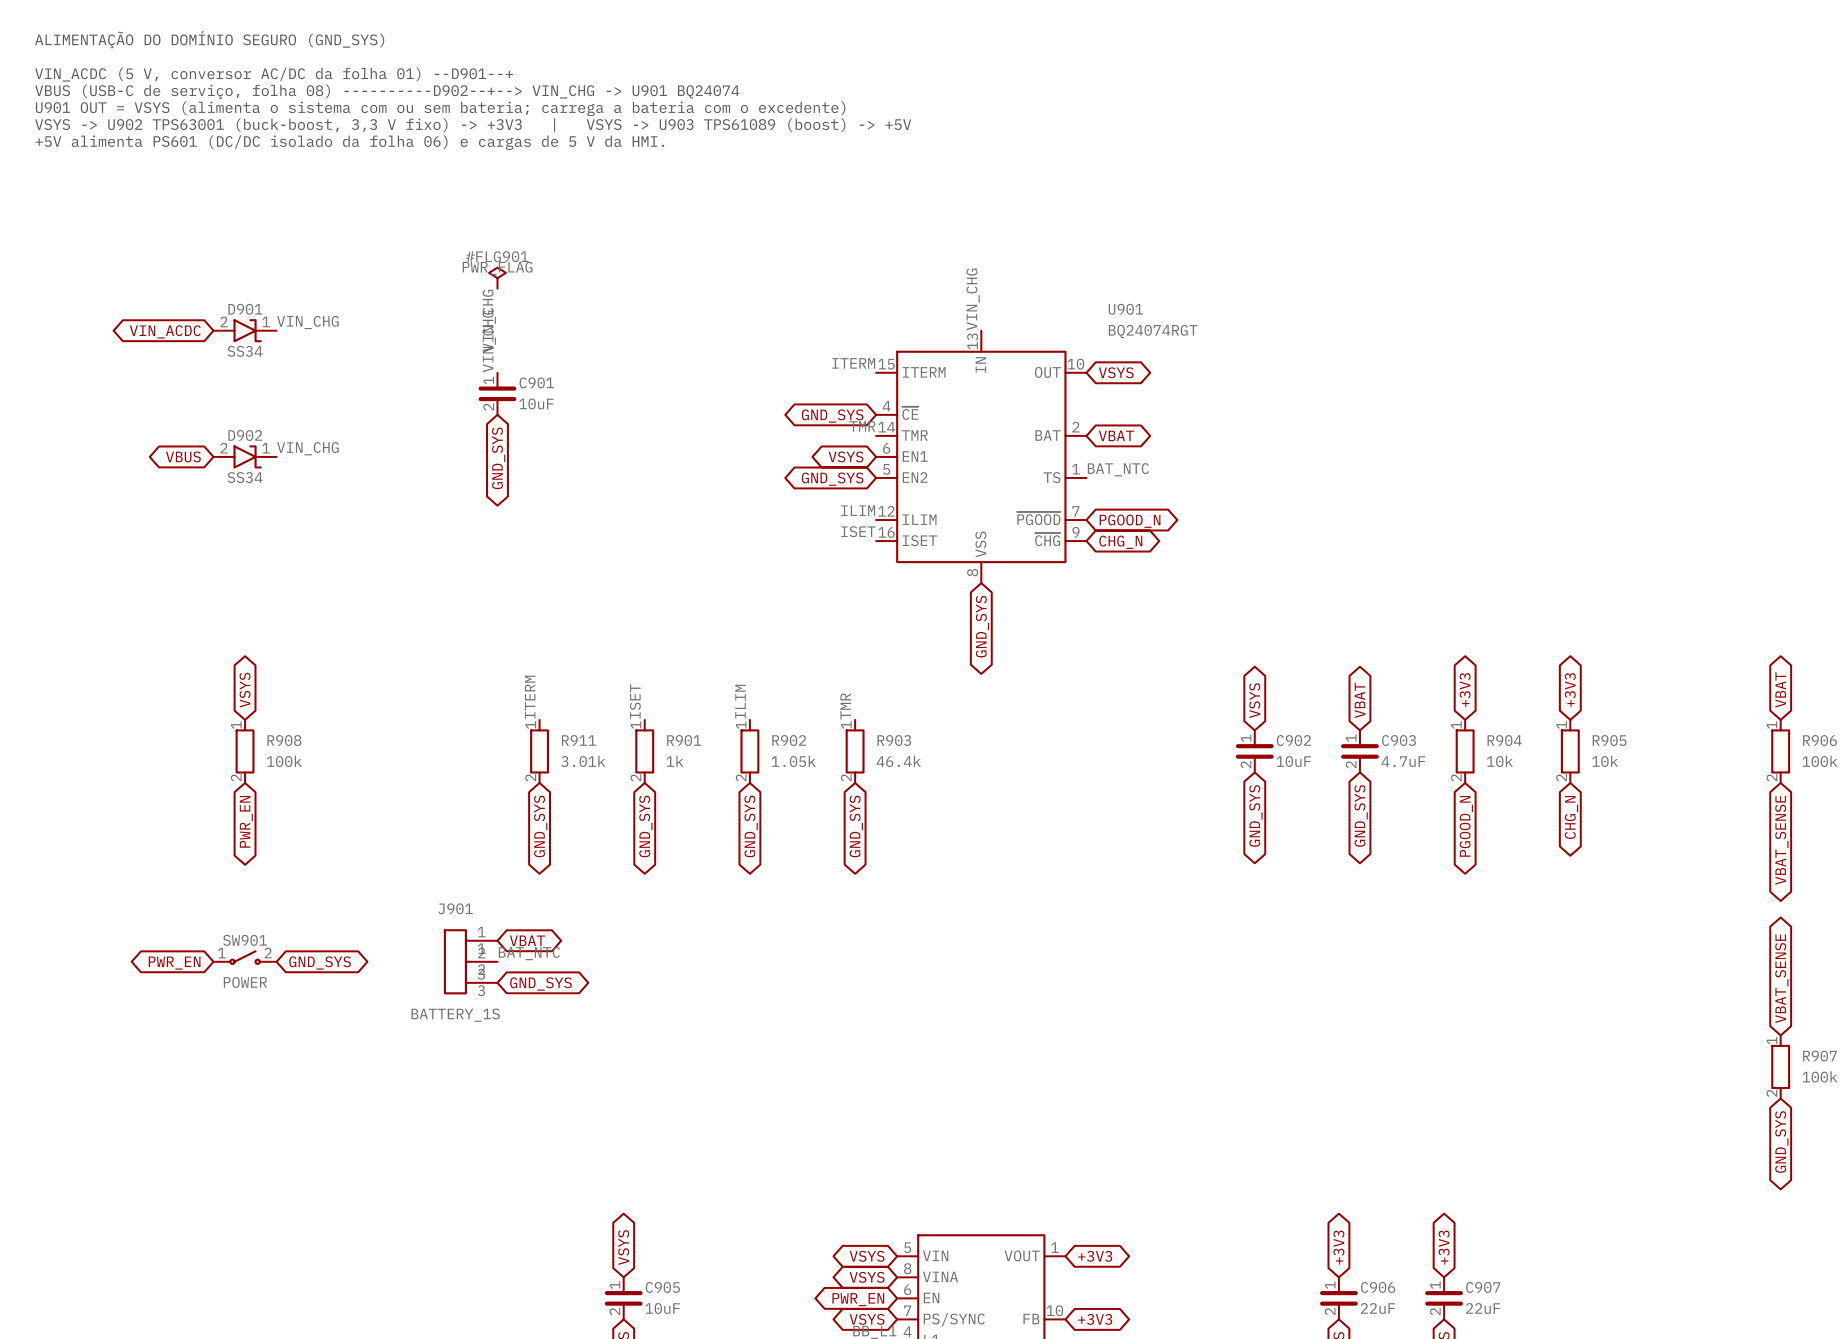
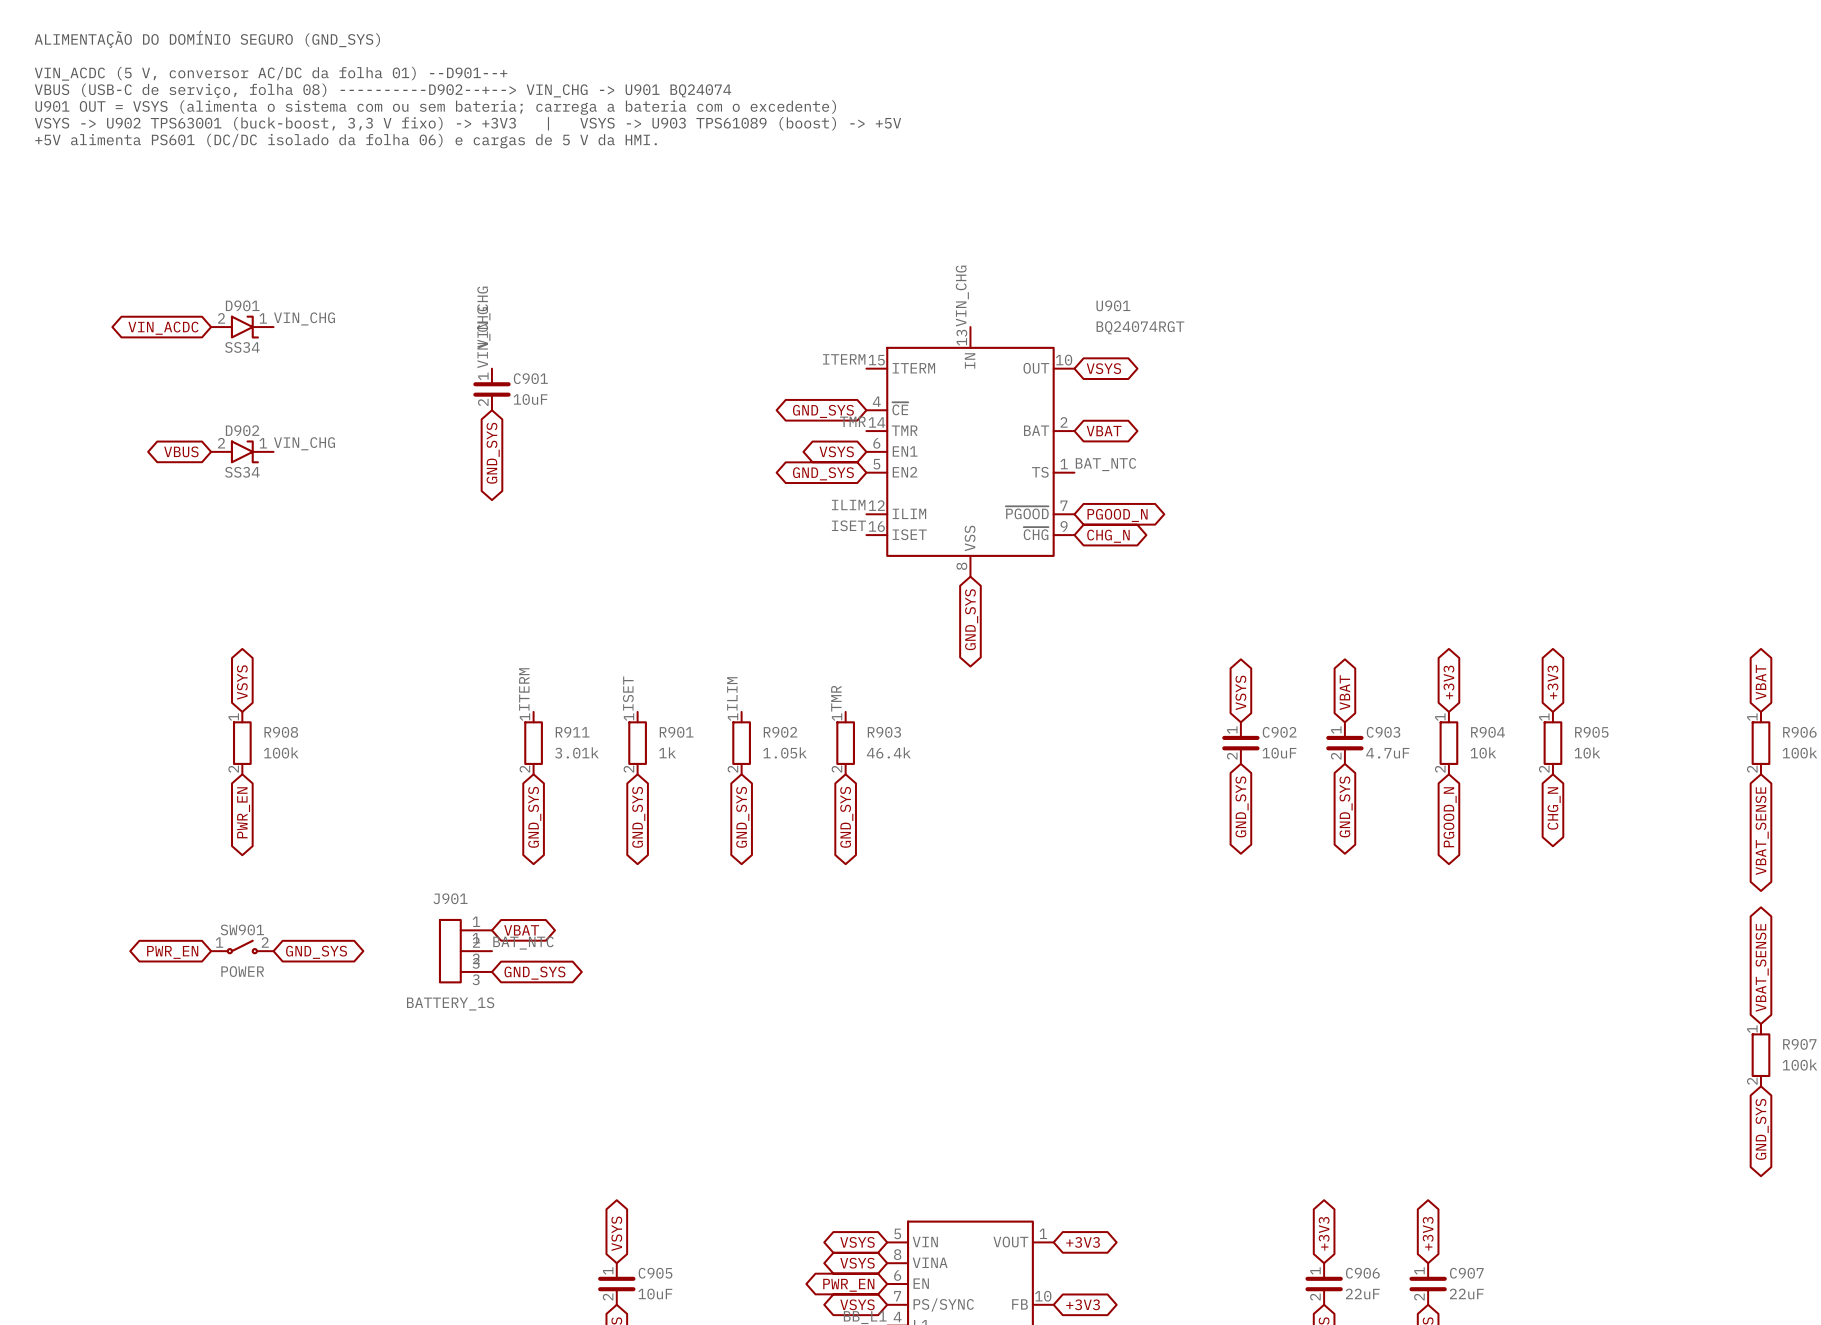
#FLG901: PWR_FLAG (497, 278) -> none

